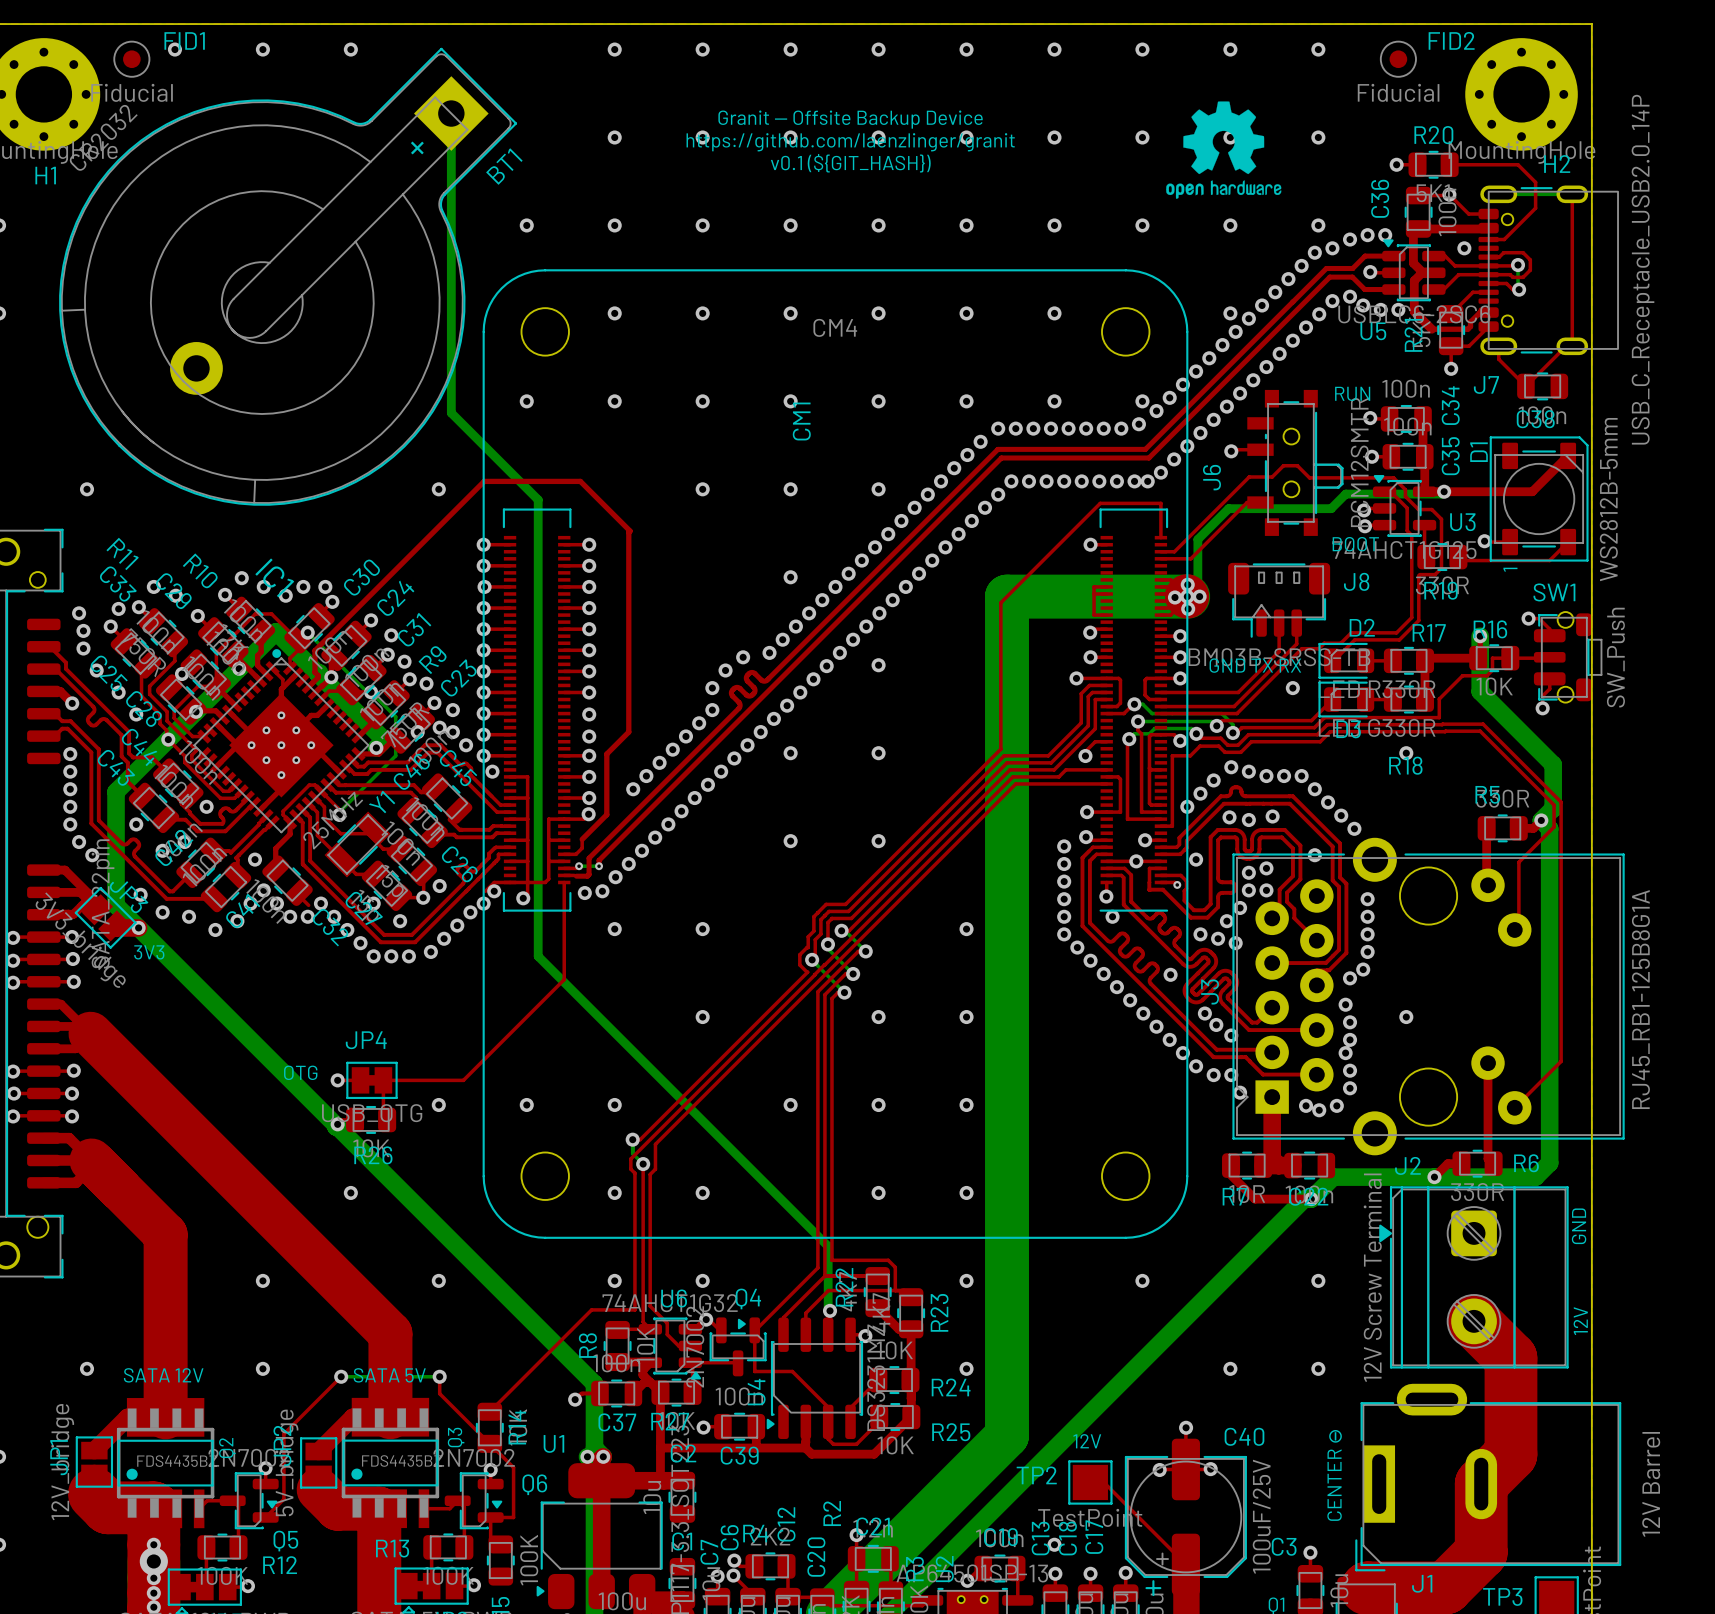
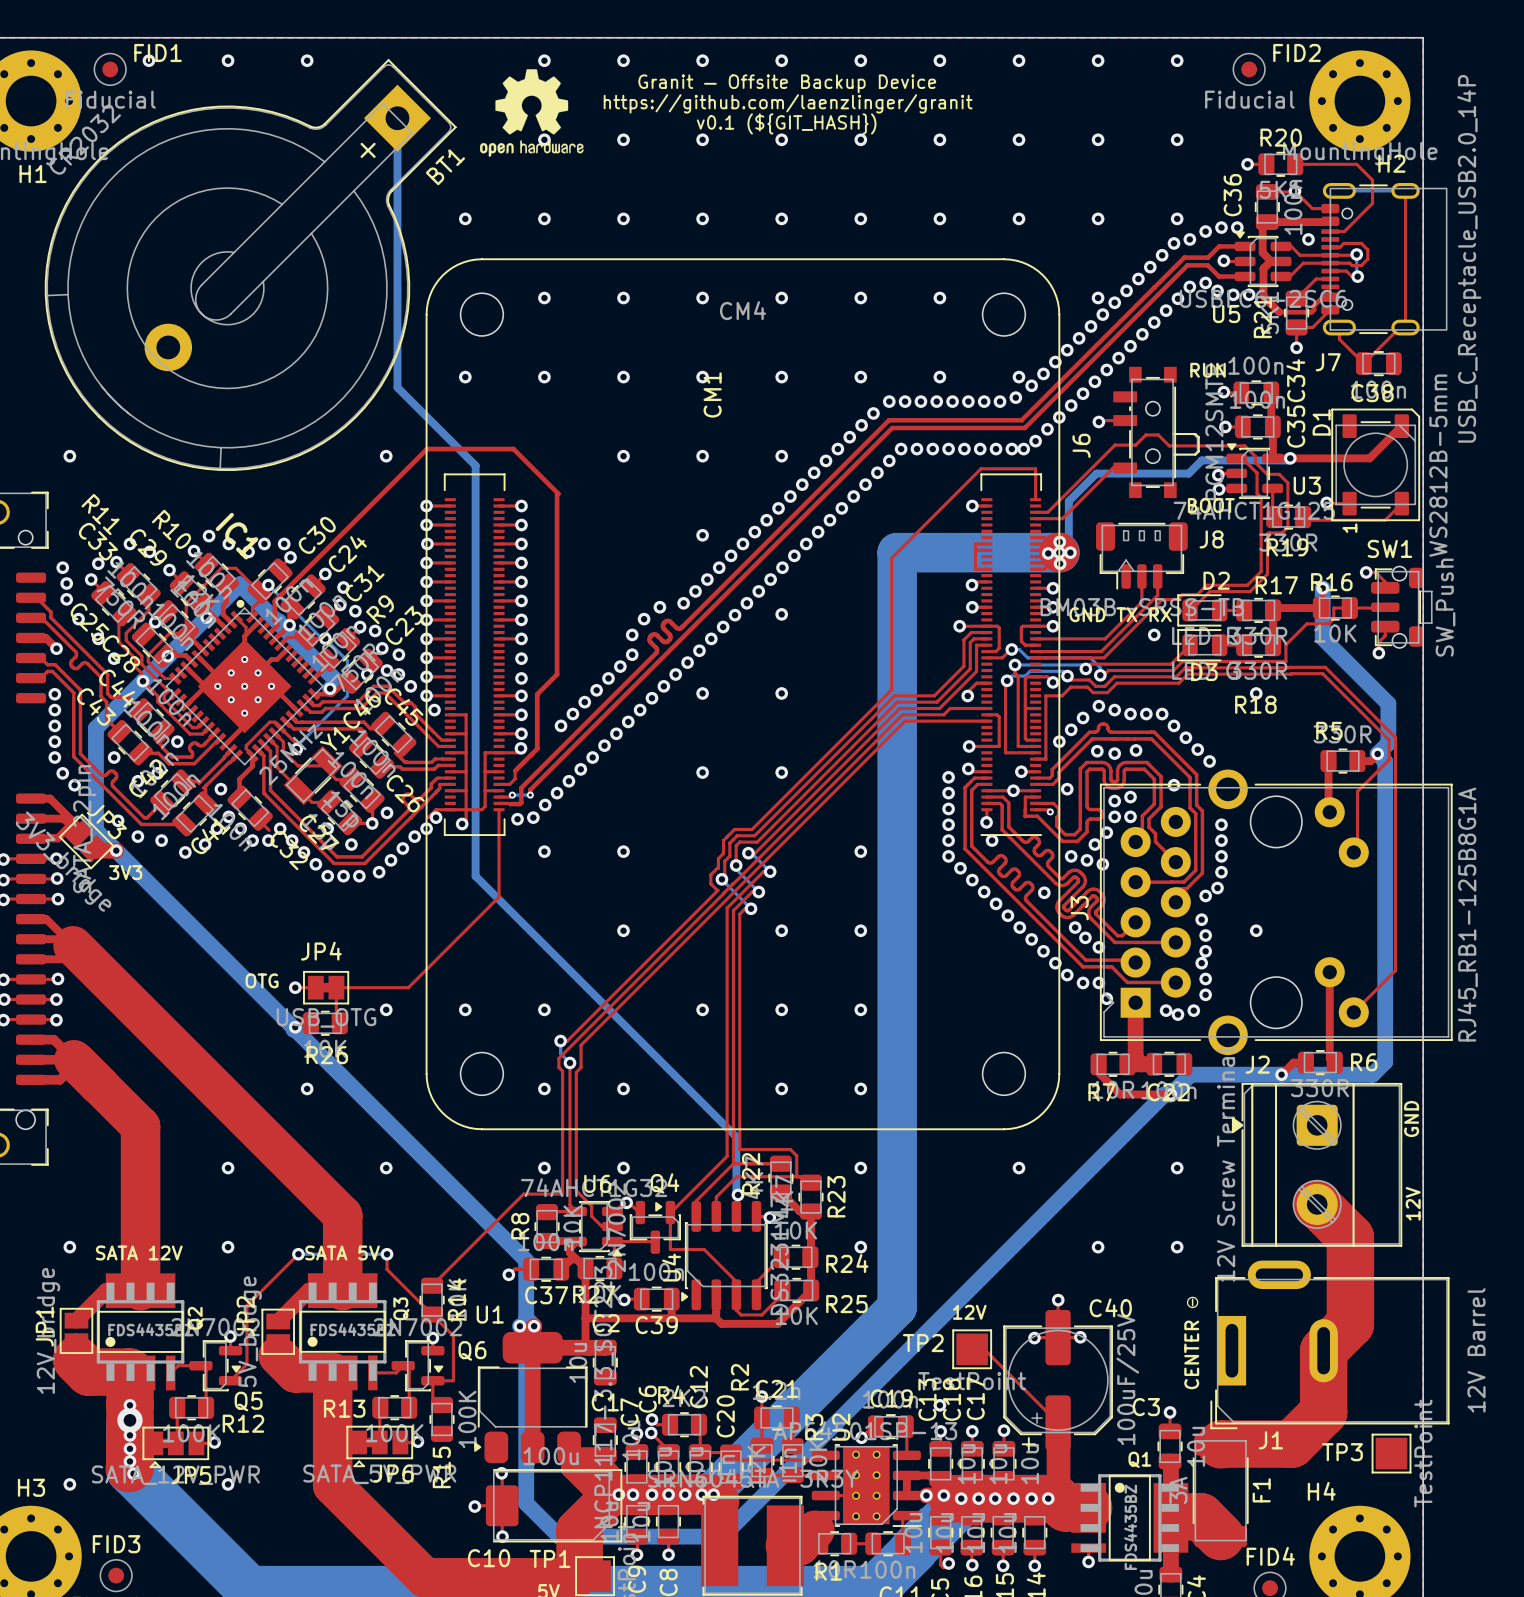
drawing: none -> [480, 69, 584, 157]
drawing: [1166, 101, 1282, 199] -> none
text position: Granit — Offsite Backup Device (850, 119) -> Granit — Offsite Backup Device (787, 83)
text position: https://github.com/laenzlinger/granit (850, 142) -> https://github.com/laenzlinger/granit (788, 103)
text position: v0.1 (${GIT_HASH}) (850, 163) -> v0.1 (${GIT_HASH}) (786, 123)

